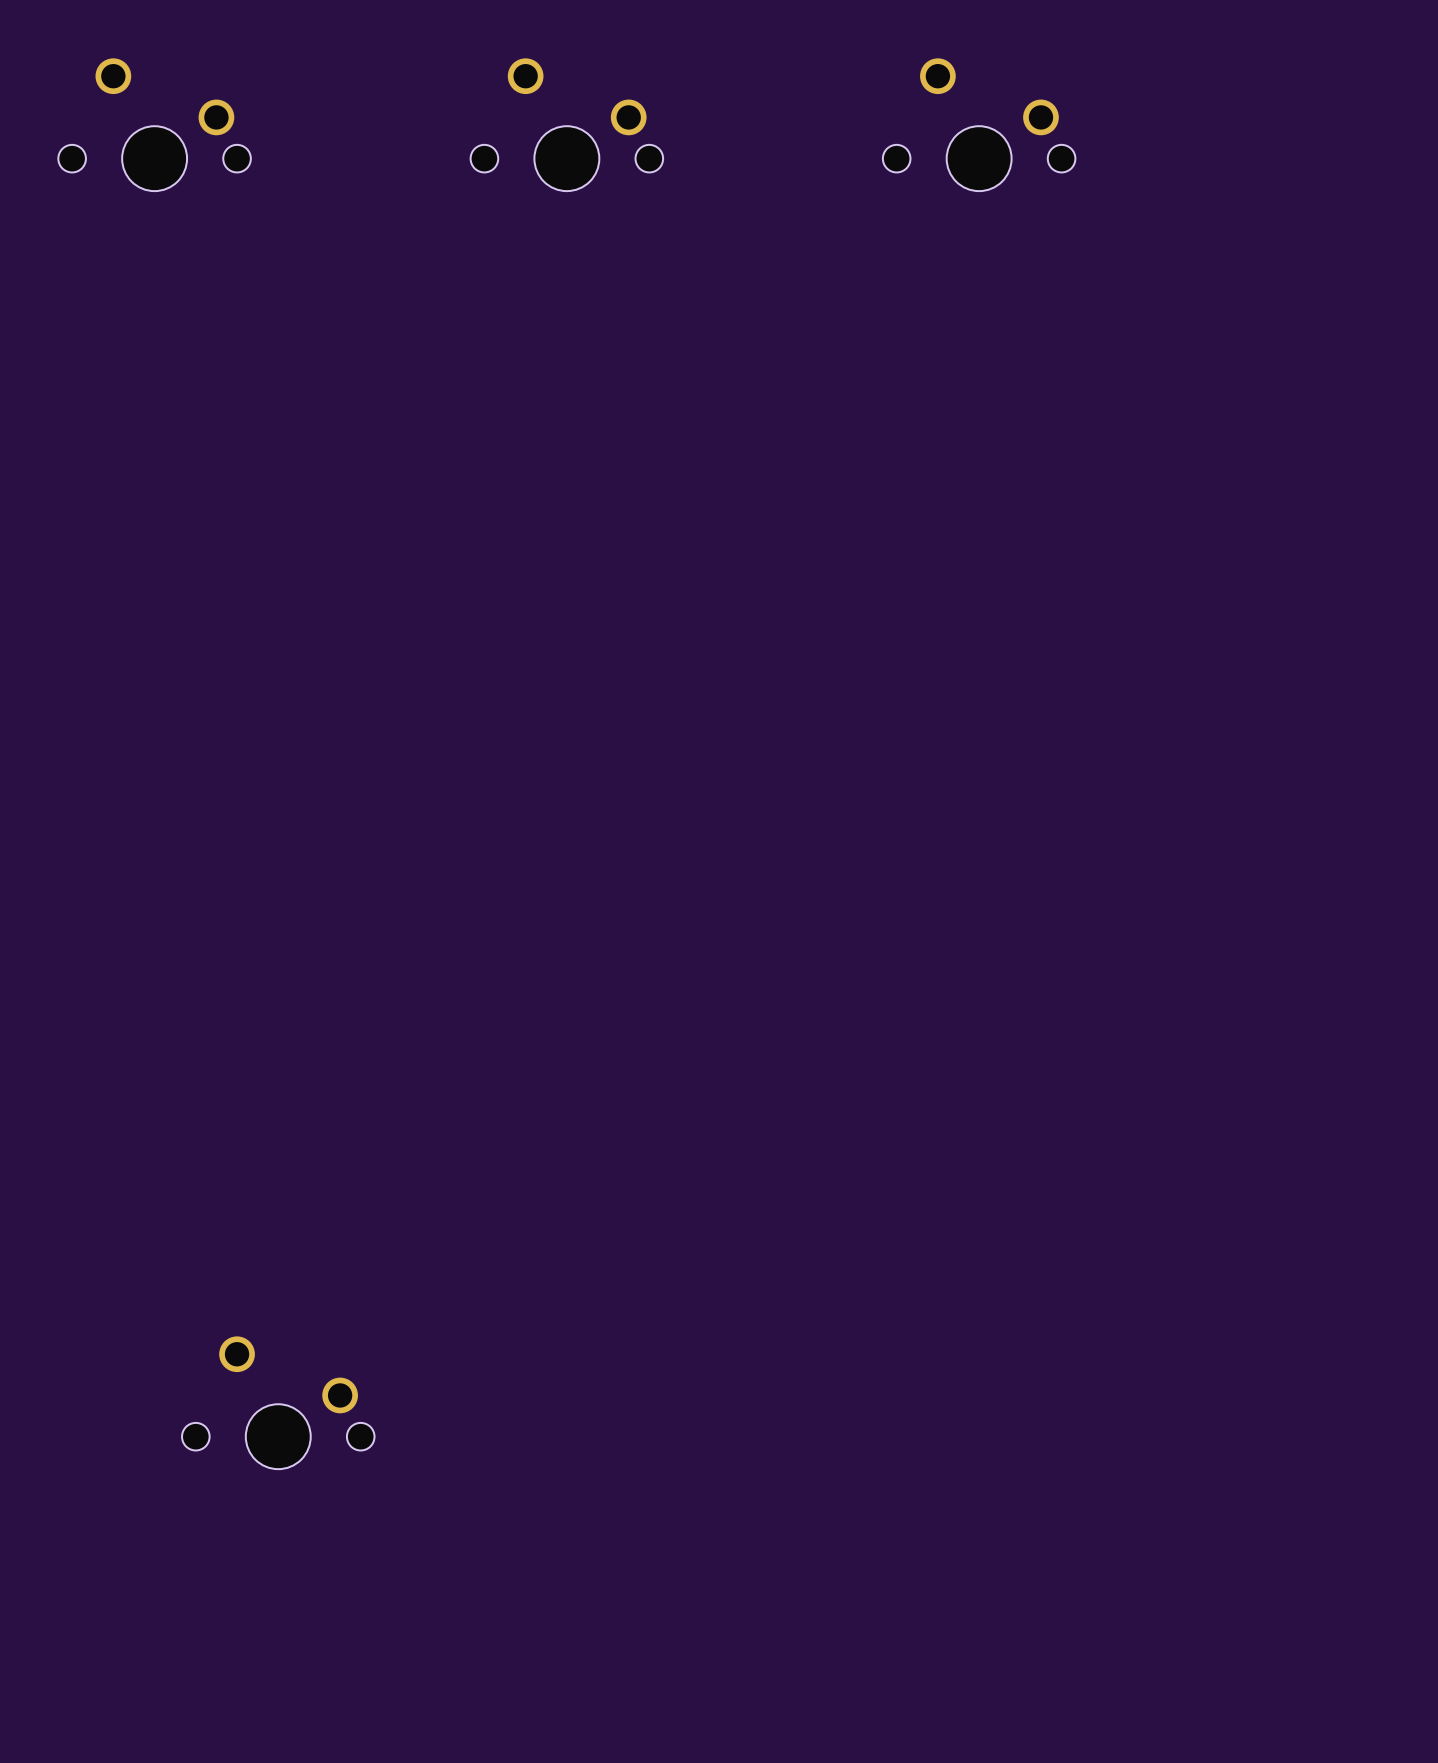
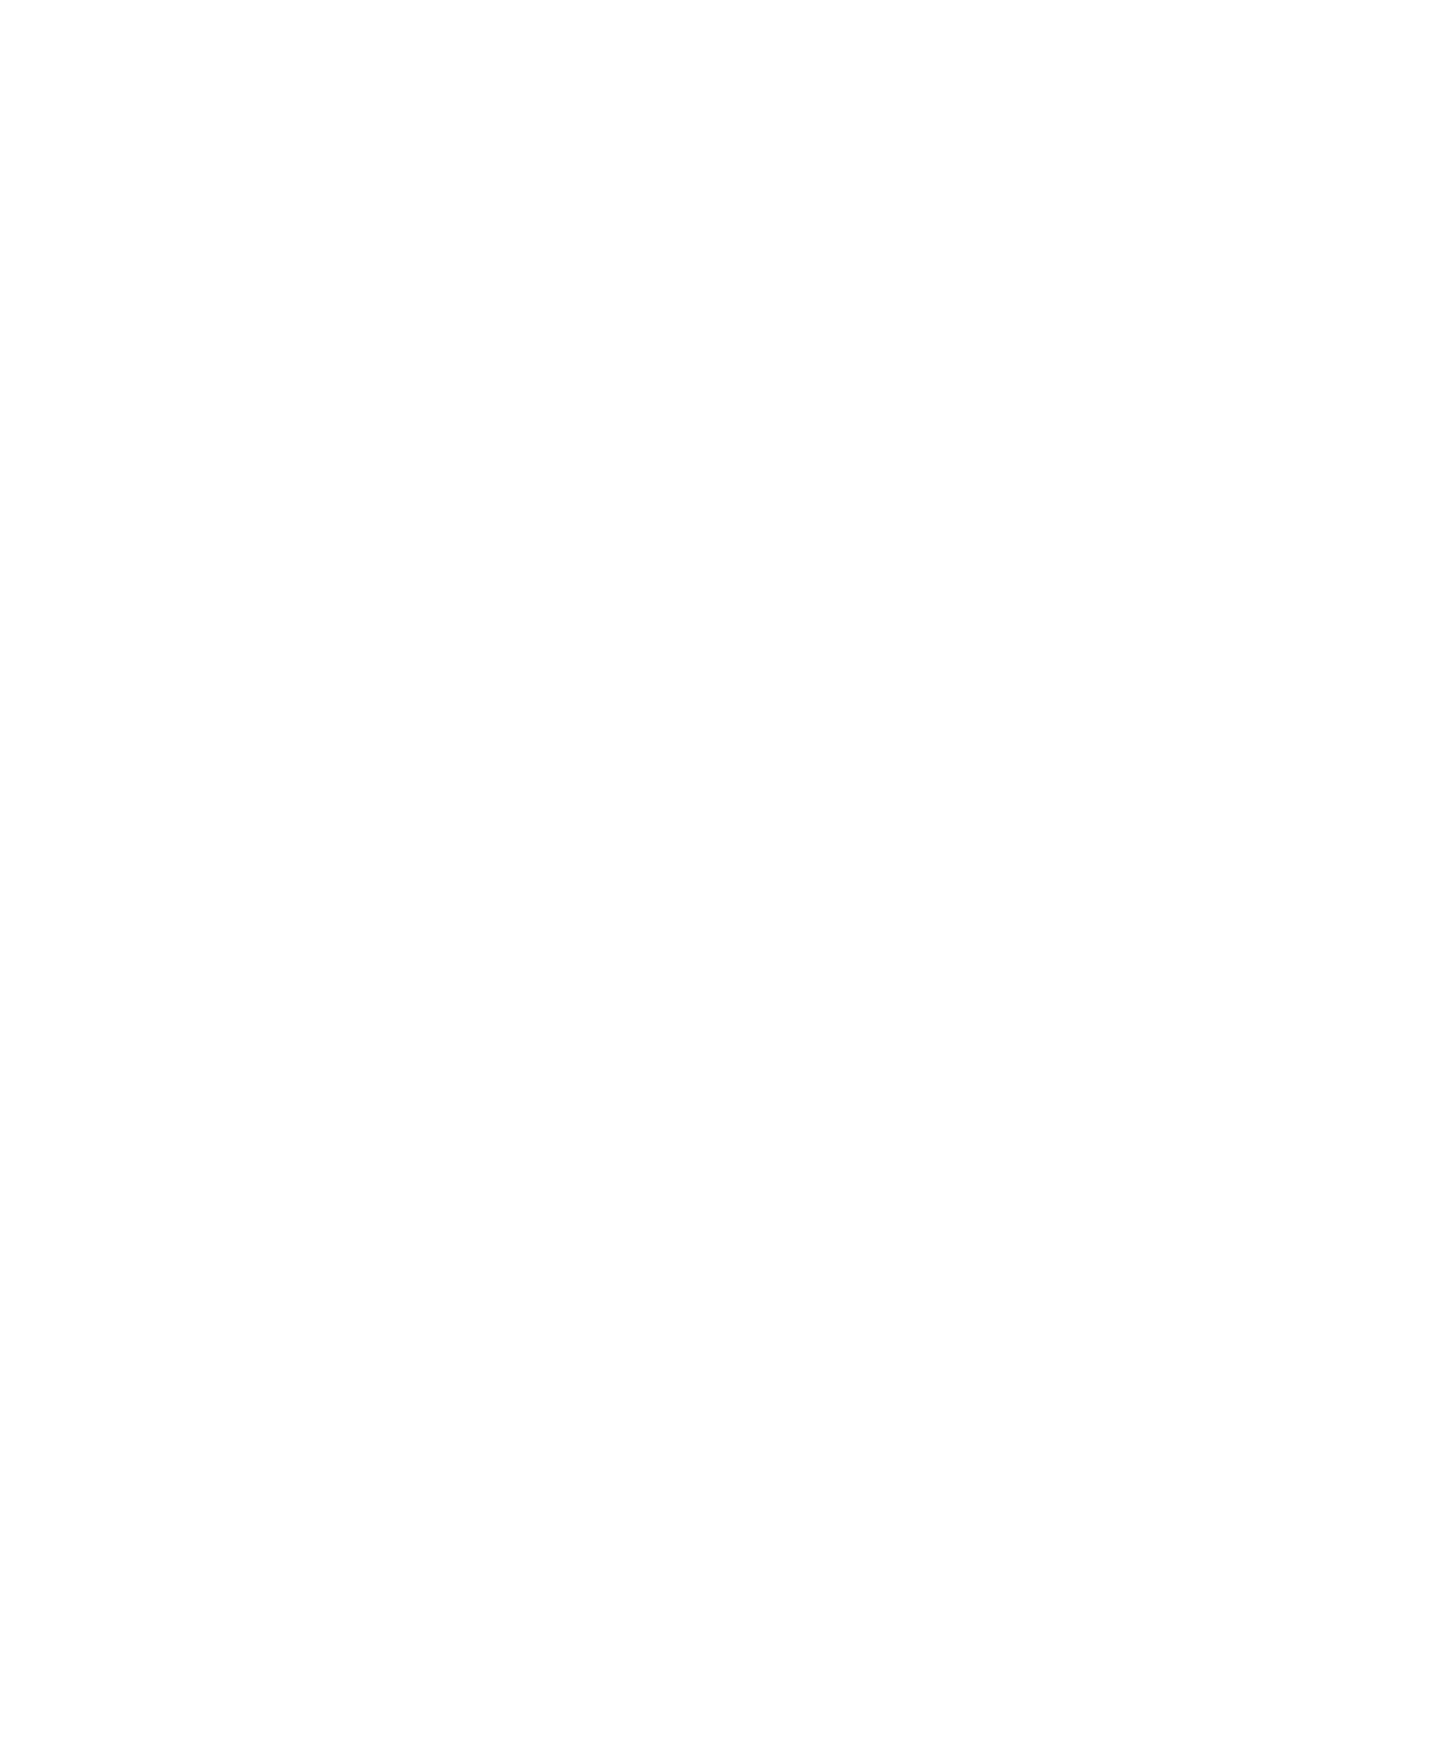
part: (154, 124) -> none
part: (566, 124) -> none
part: (979, 124) -> none
part: (278, 1402) -> none

